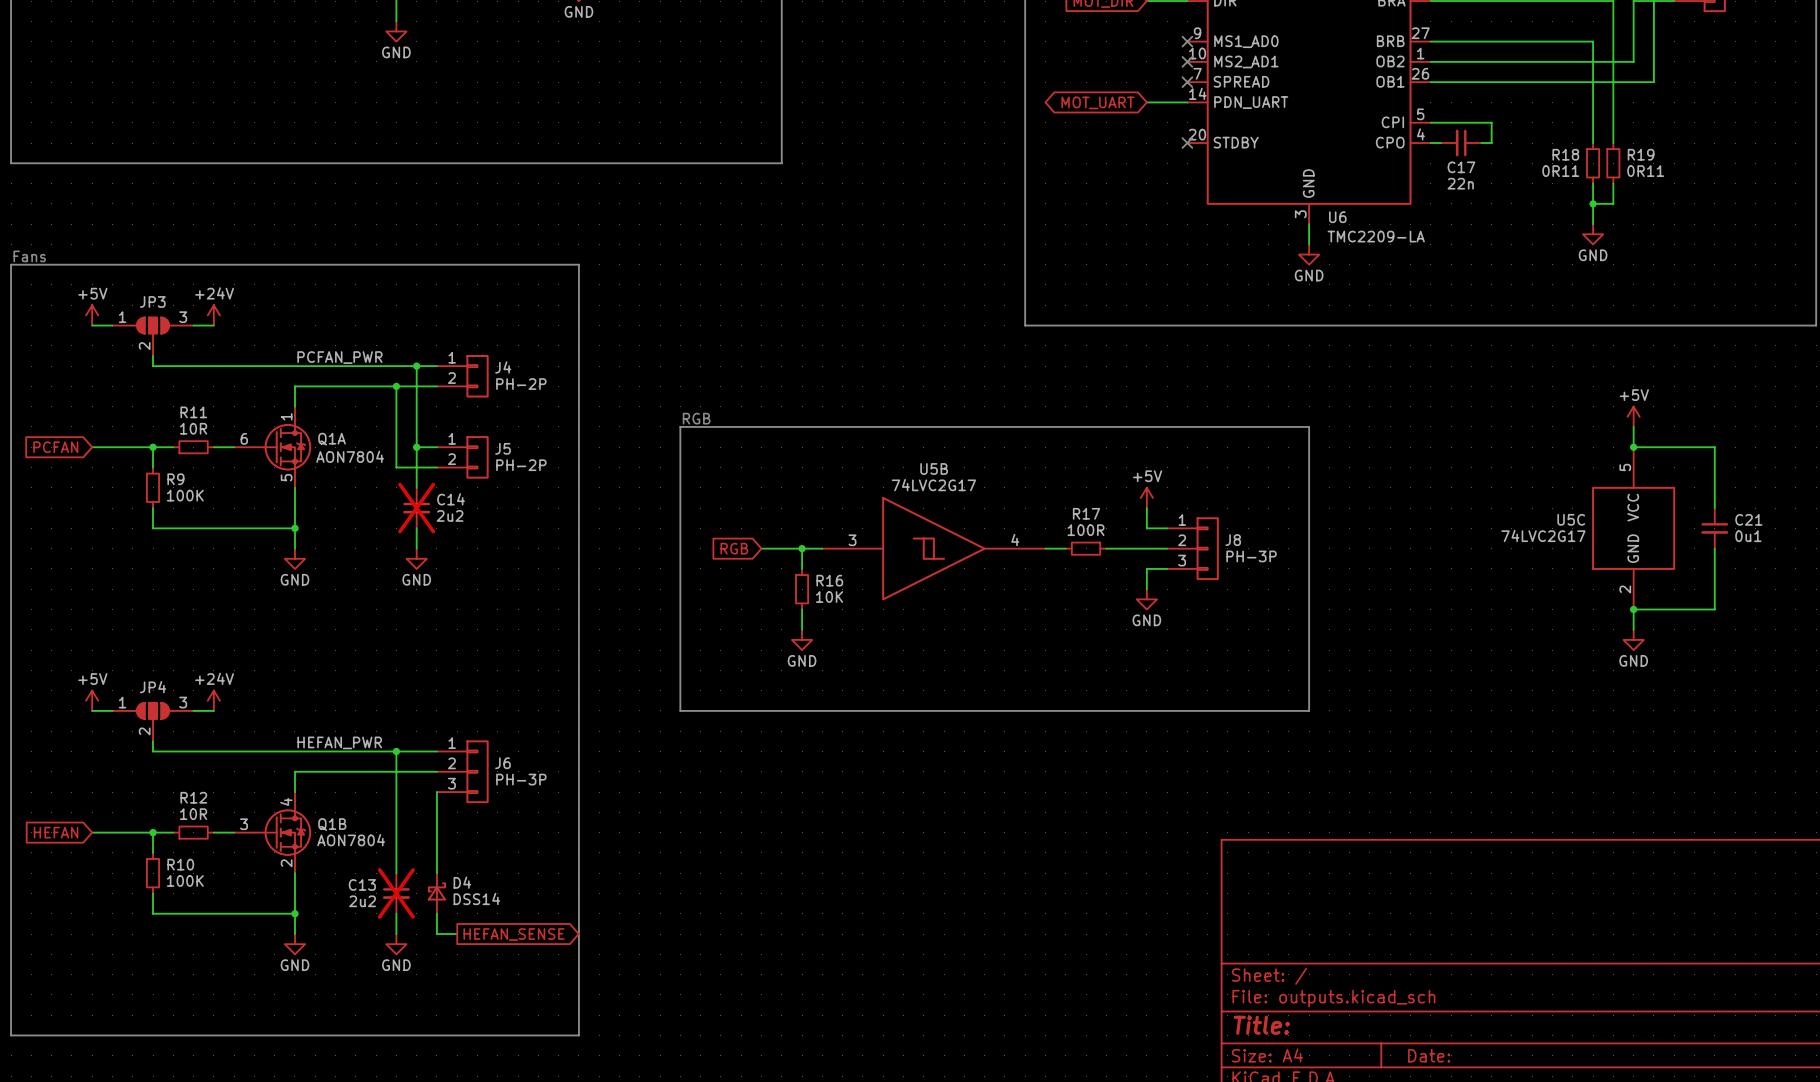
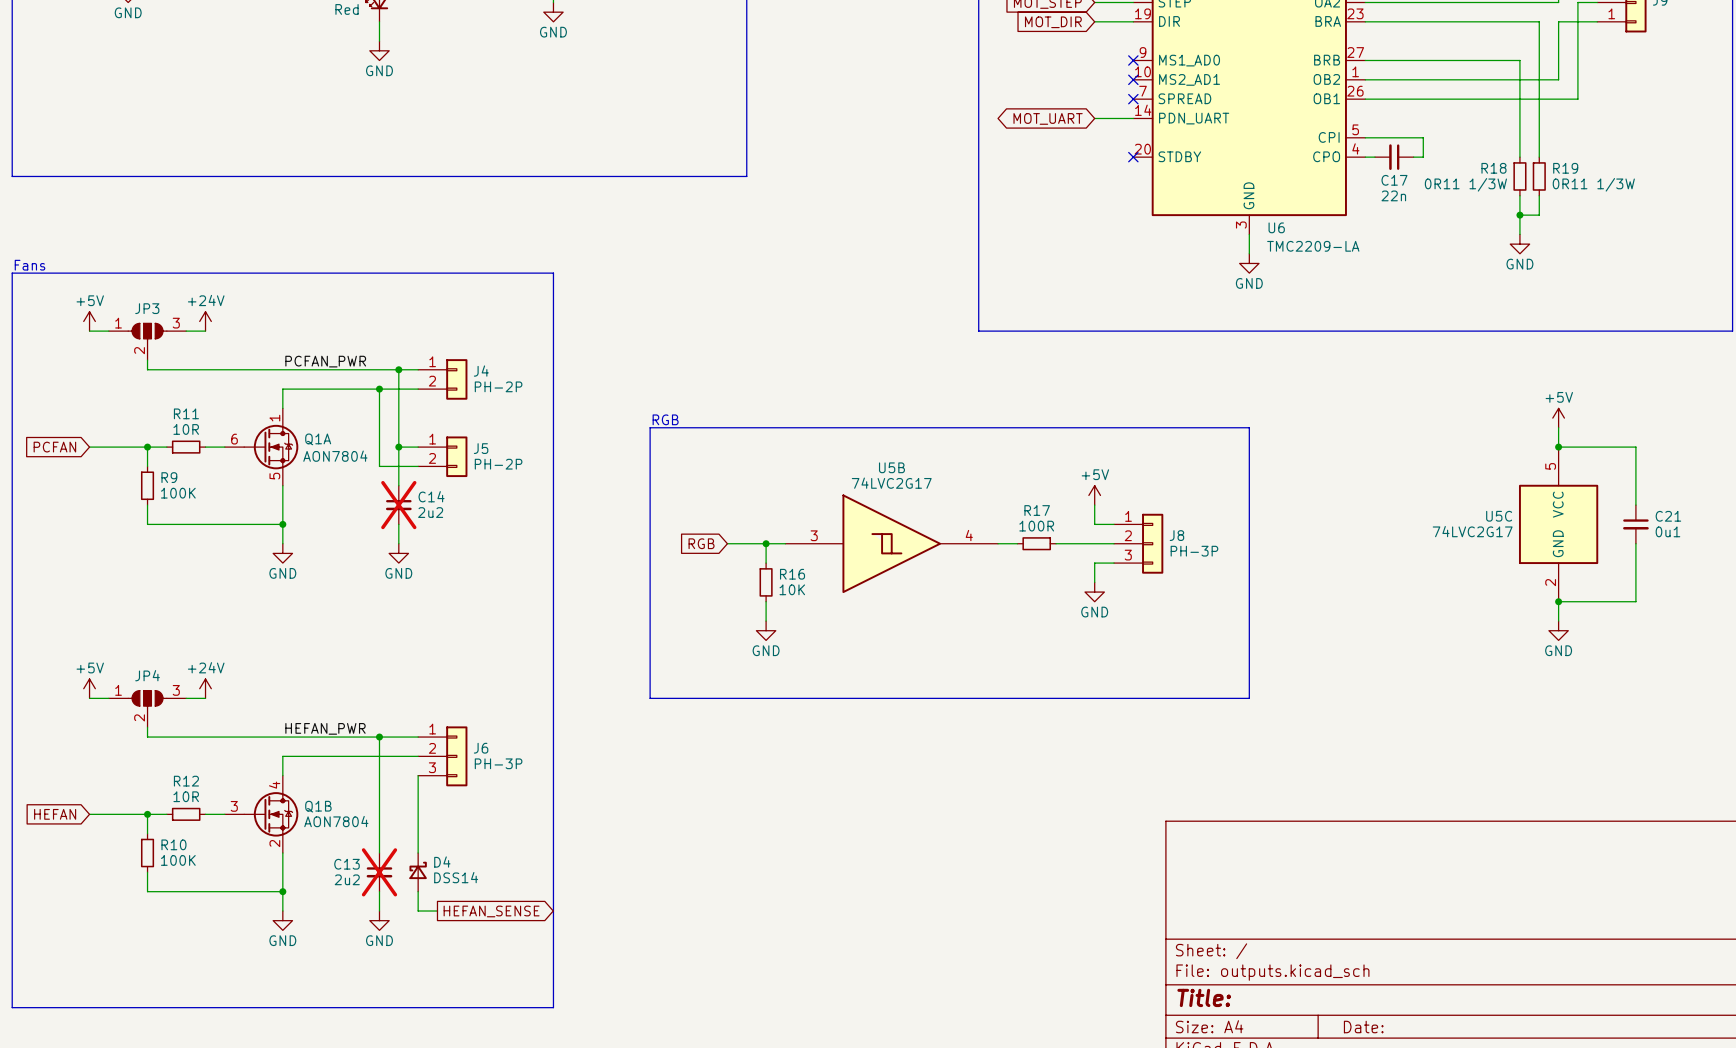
R18 value: 0R11 (1560, 171) -> 0R11 1/3W (1465, 184)
R19 value: 0R11 (1645, 171) -> 0R11 1/3W (1593, 184)

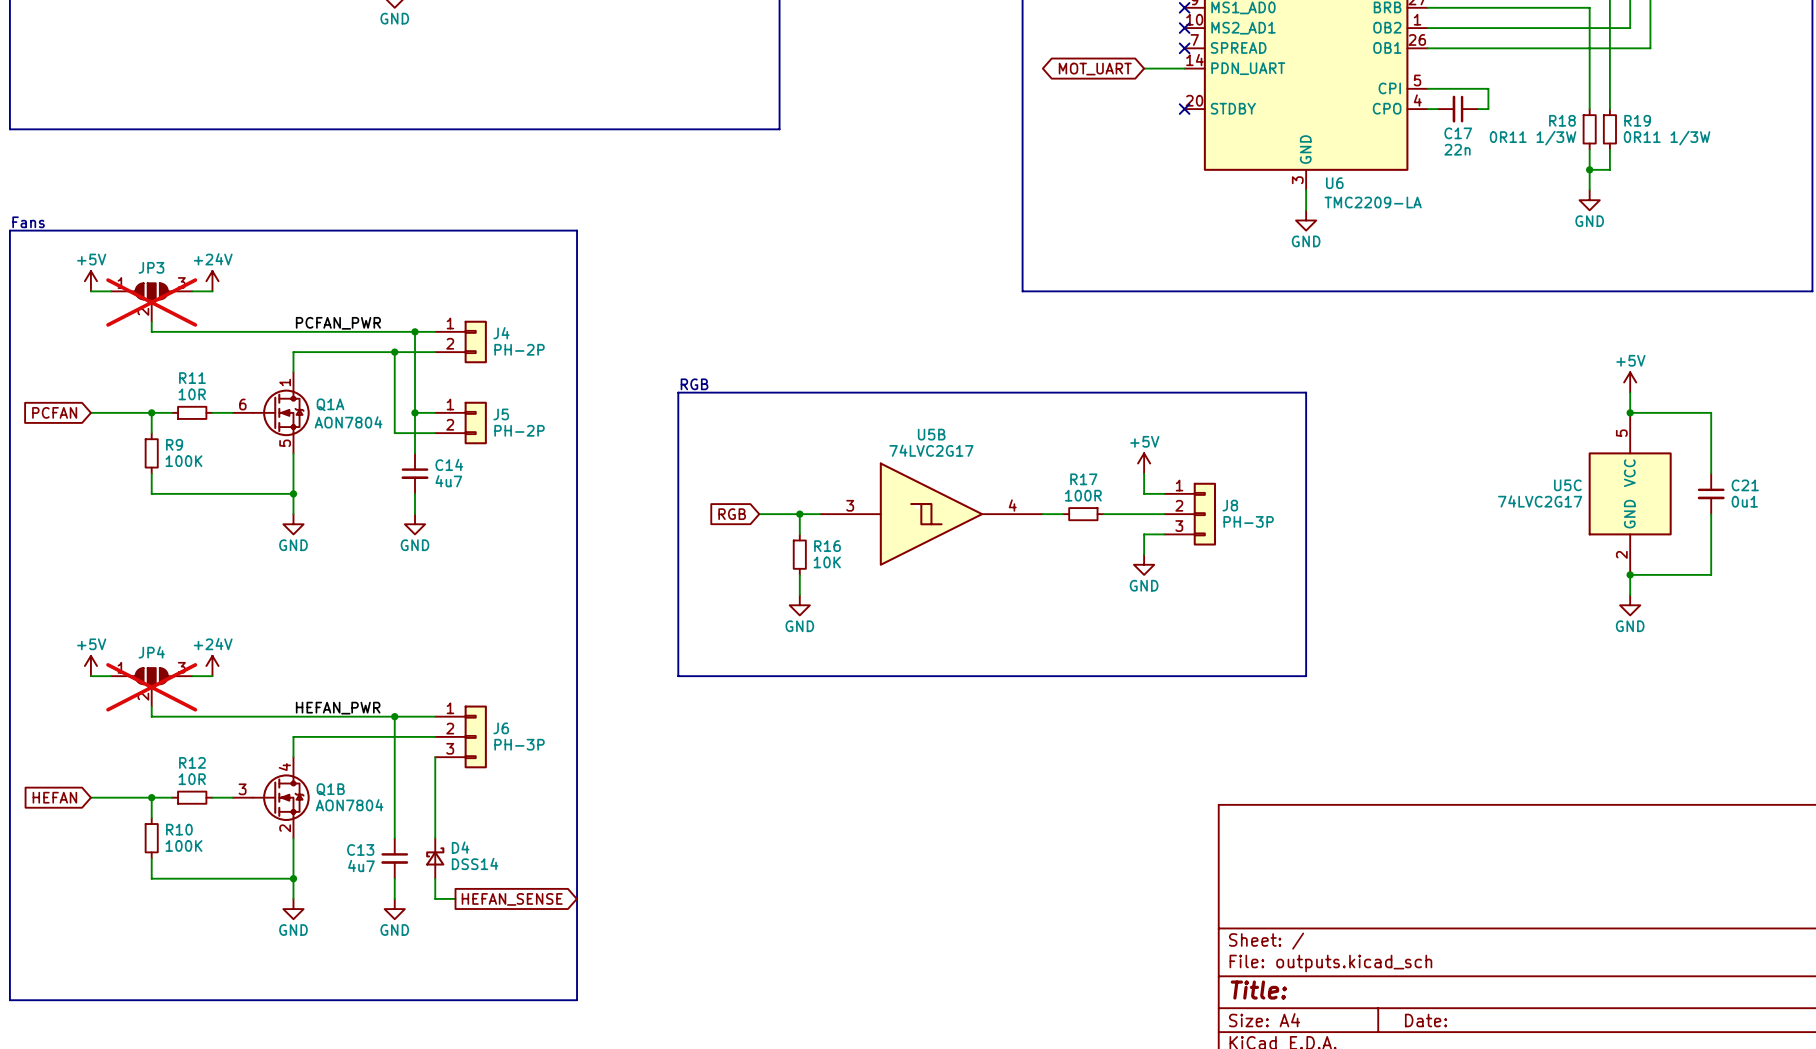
JP3 do-not-place cross: none -> (151, 302)
C14 do-not-place cross: (398, 505) -> none
C14 value: 2u2 (430, 512) -> 4u7 (448, 481)
JP4 do-not-place cross: none -> (151, 687)
C13 do-not-place cross: (379, 872) -> none
C13 value: 2u2 (347, 879) -> 4u7 (361, 866)

